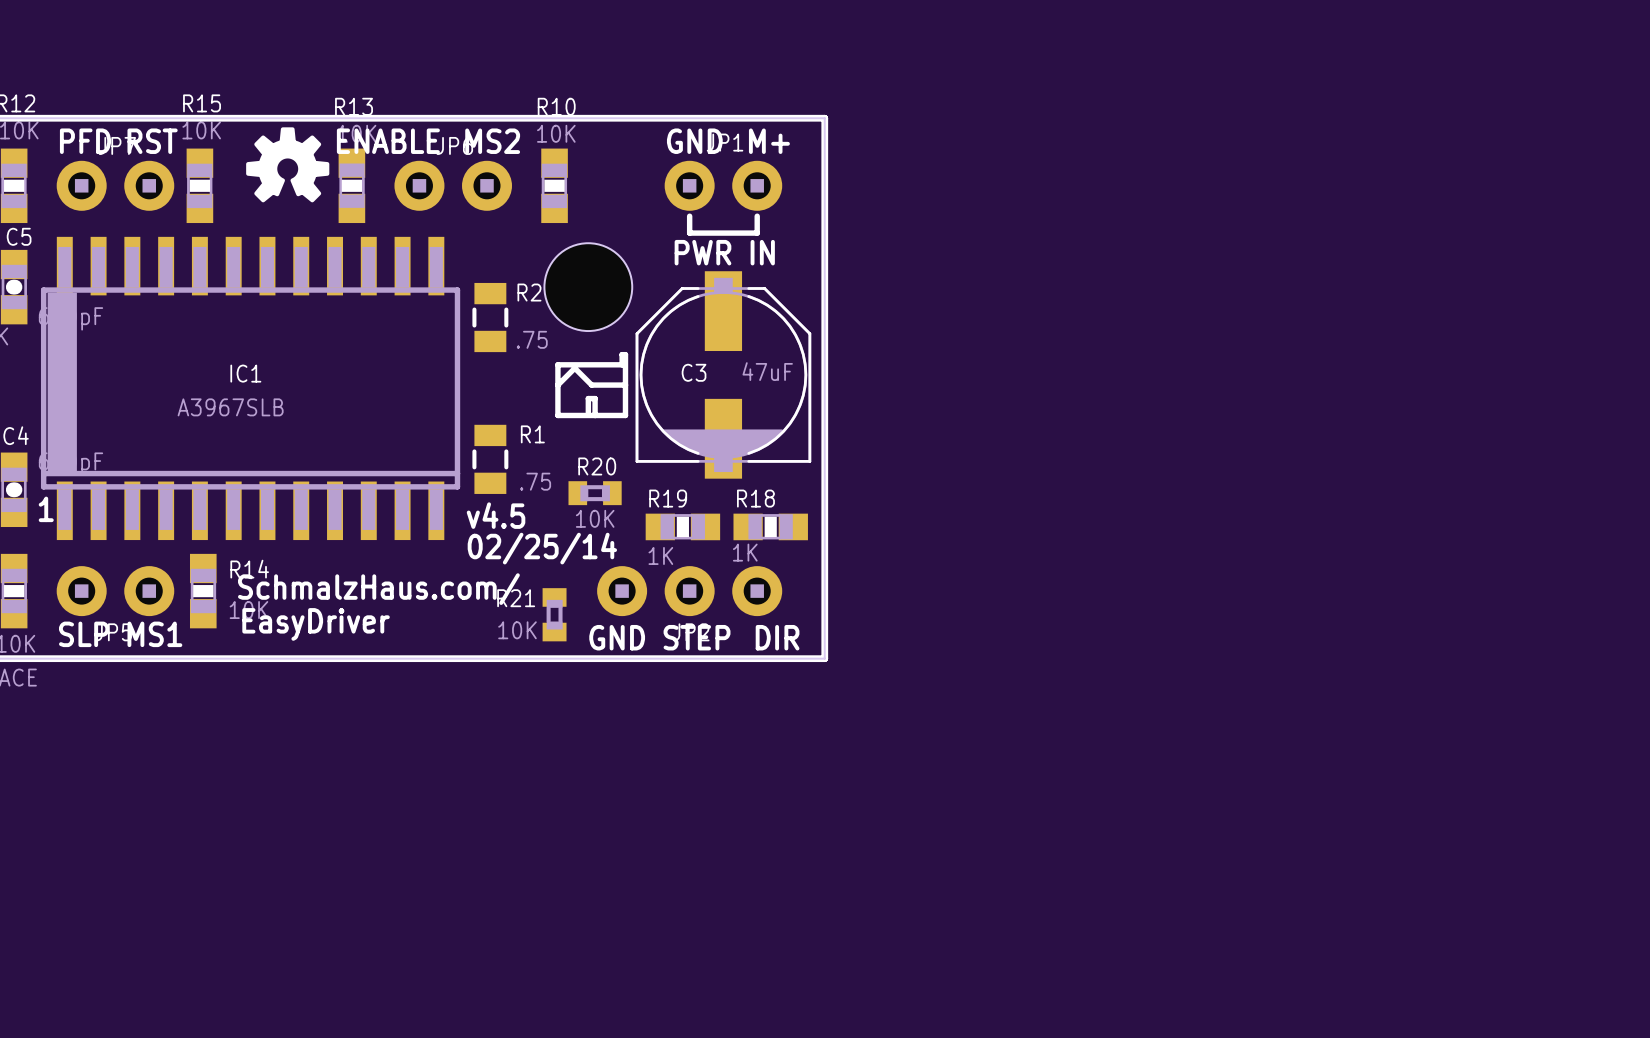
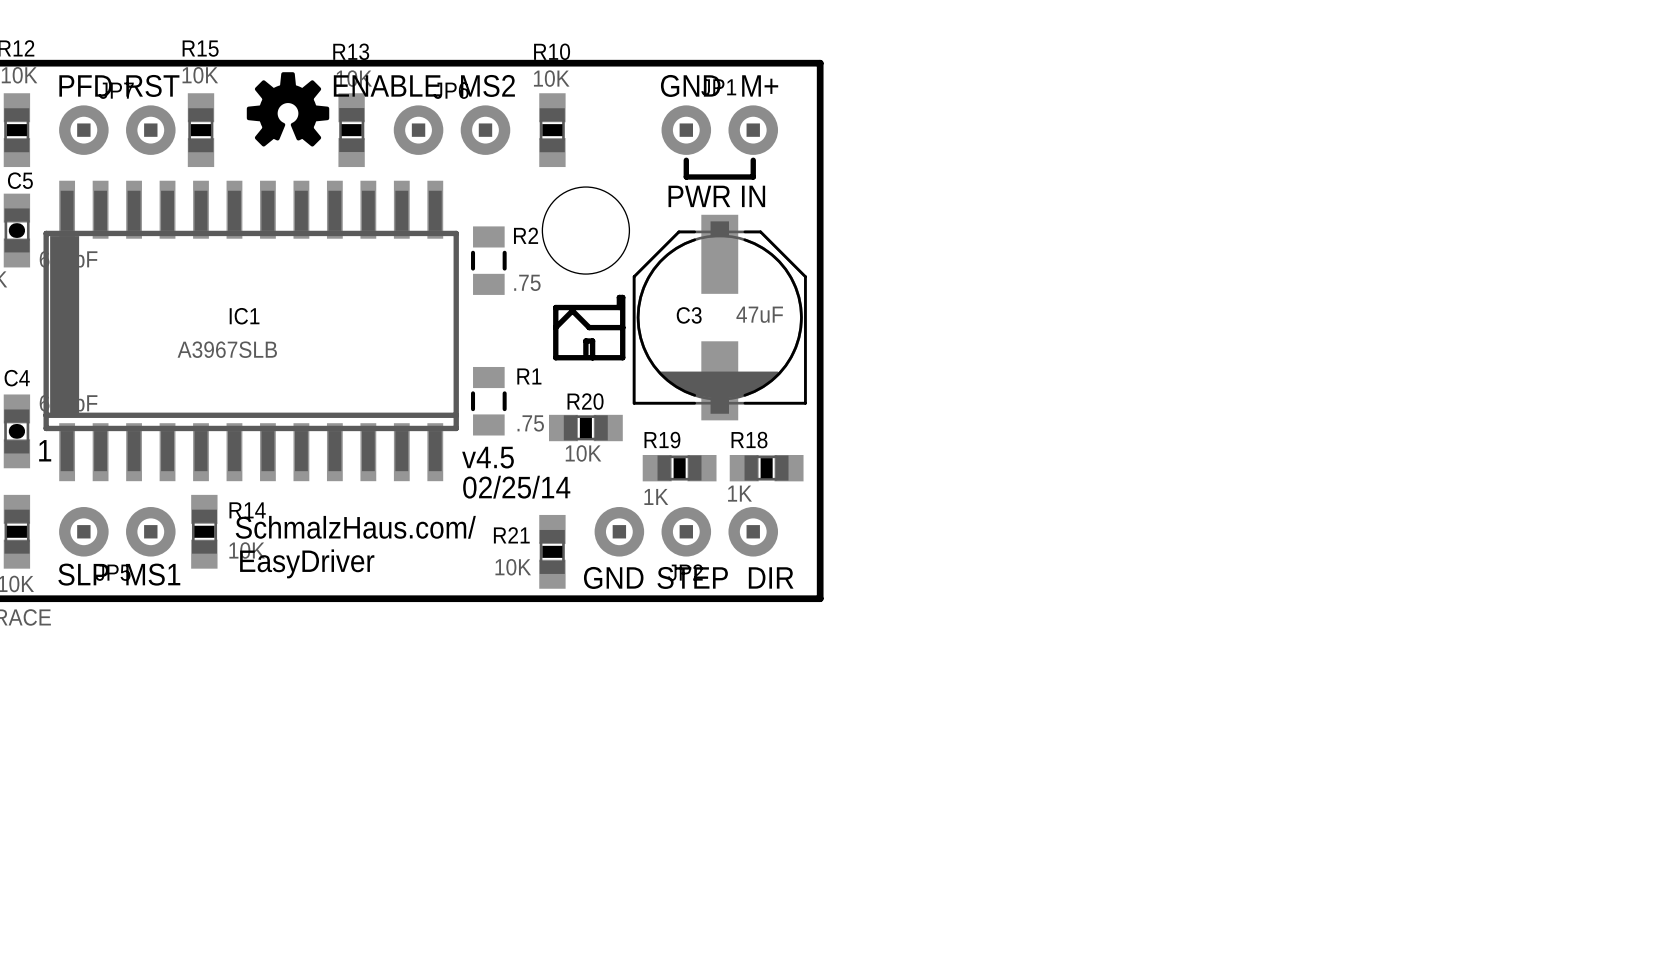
R20 footprint: [568, 481, 622, 506] -> [549, 414, 623, 442]
R21 footprint: [542, 588, 567, 642] -> [539, 514, 566, 589]

